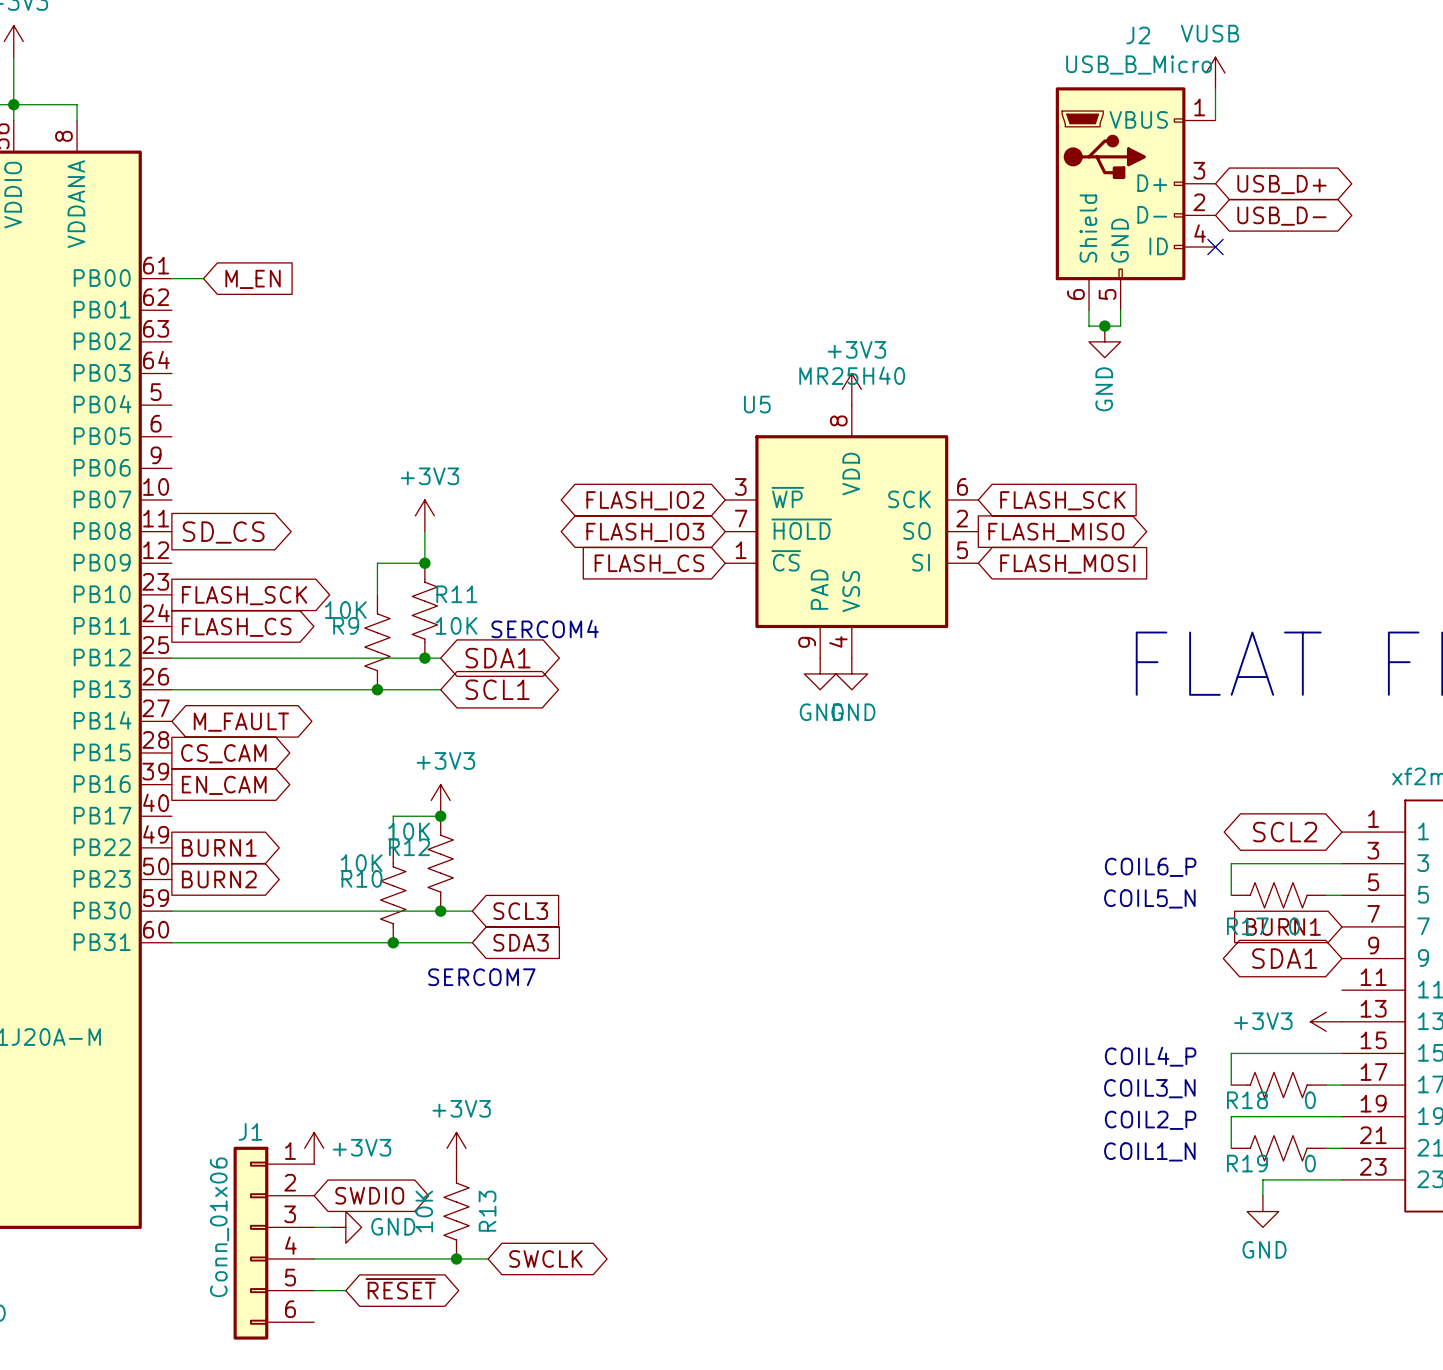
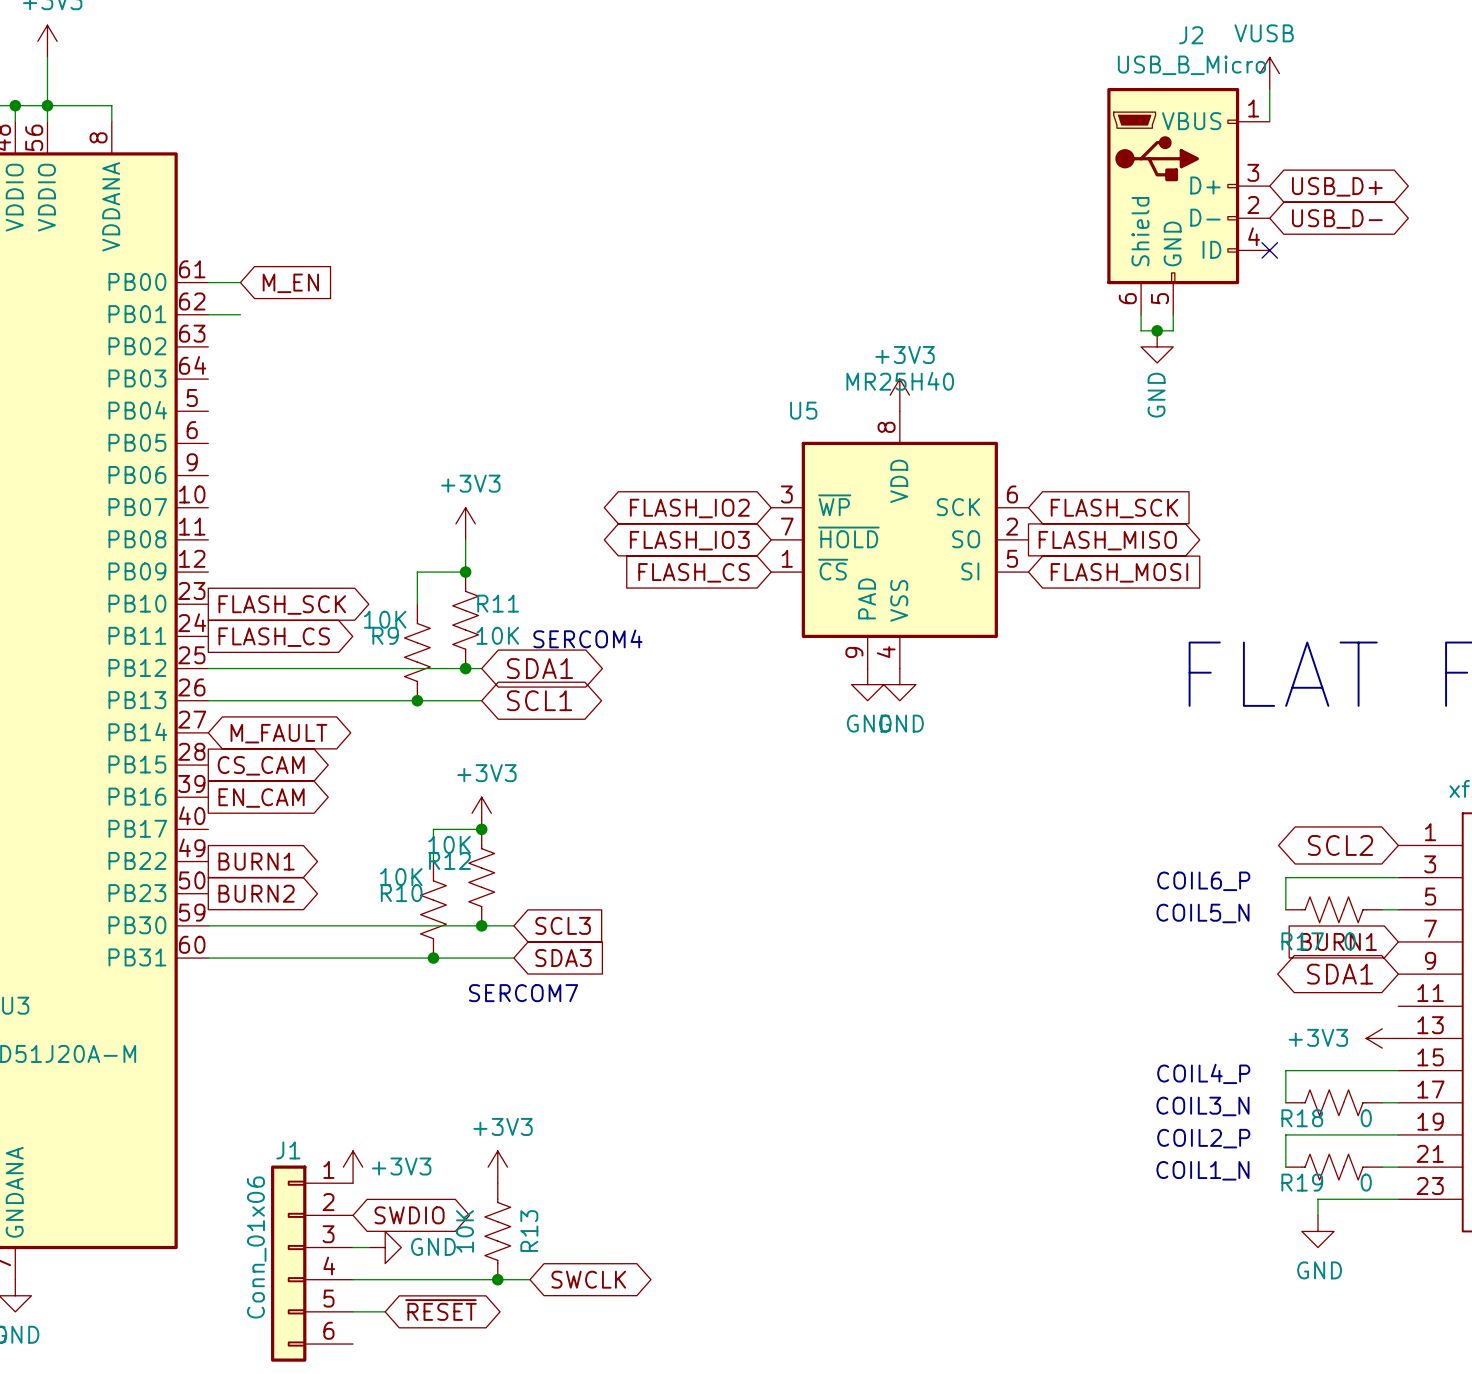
wire: none -> (208, 314) (240, 314)
global label: SD_CS (223, 532) -> none

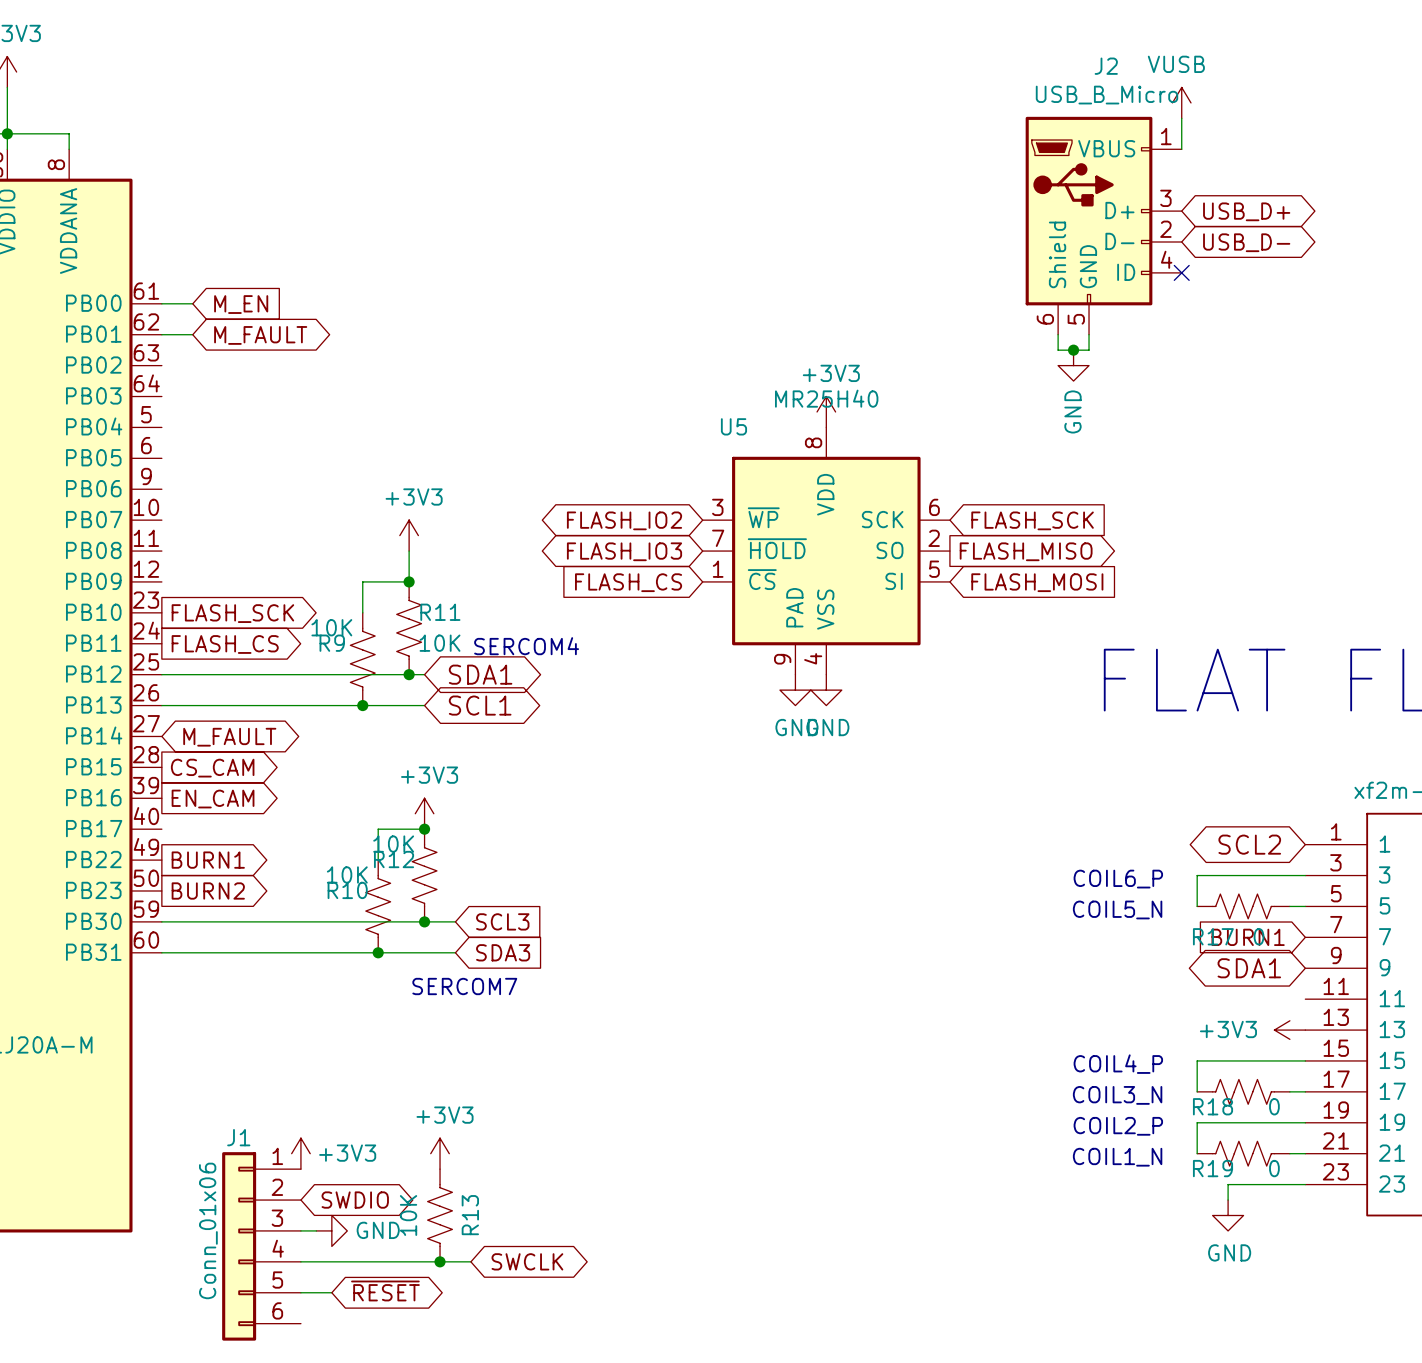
global label: none -> M_FAULT (260, 335)

